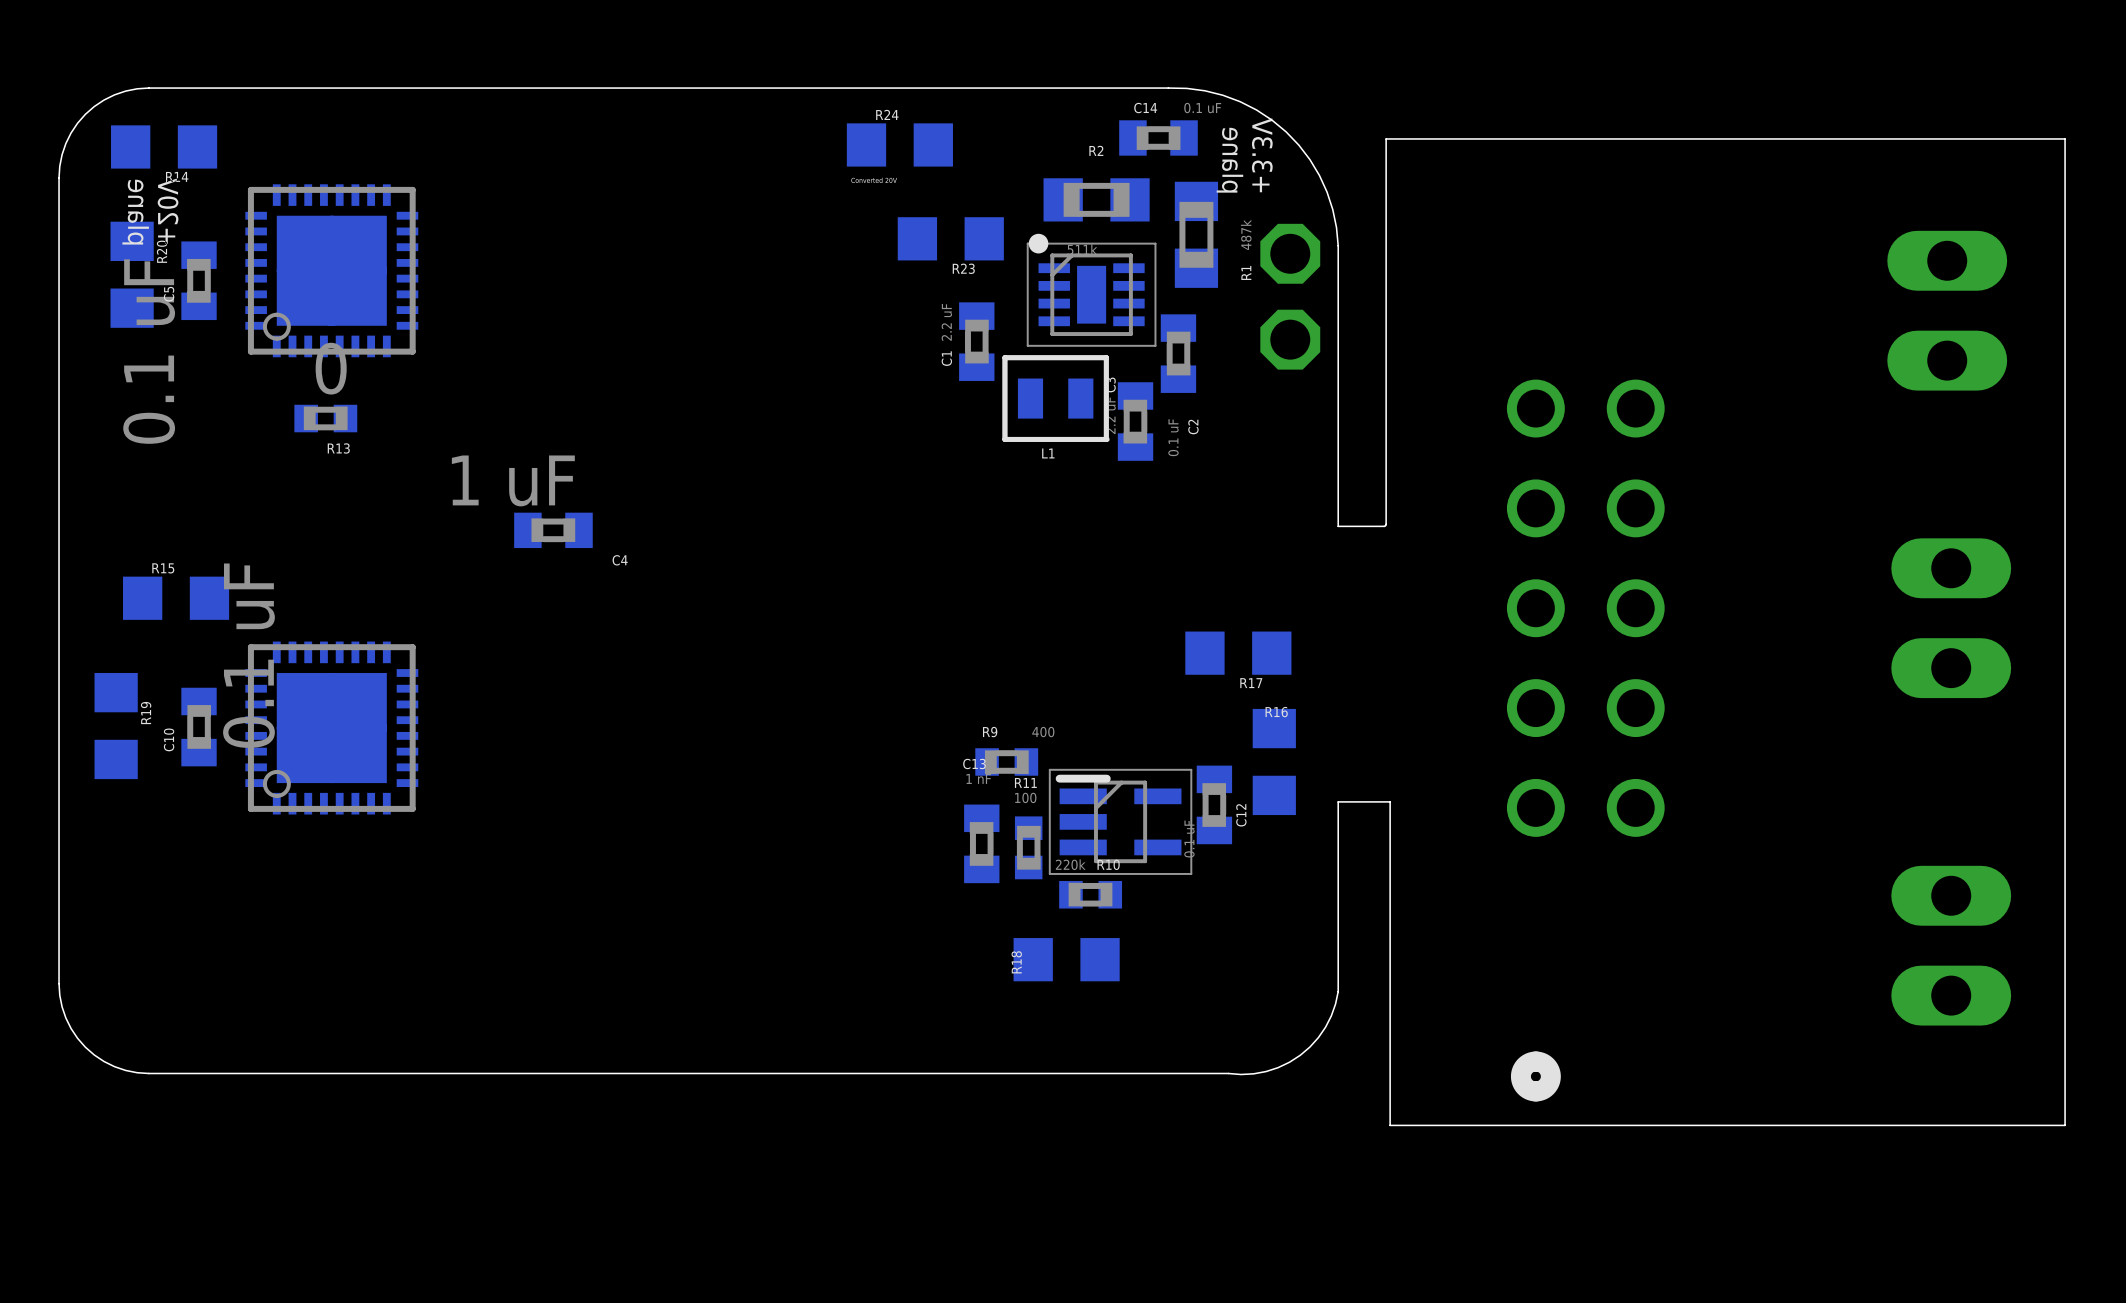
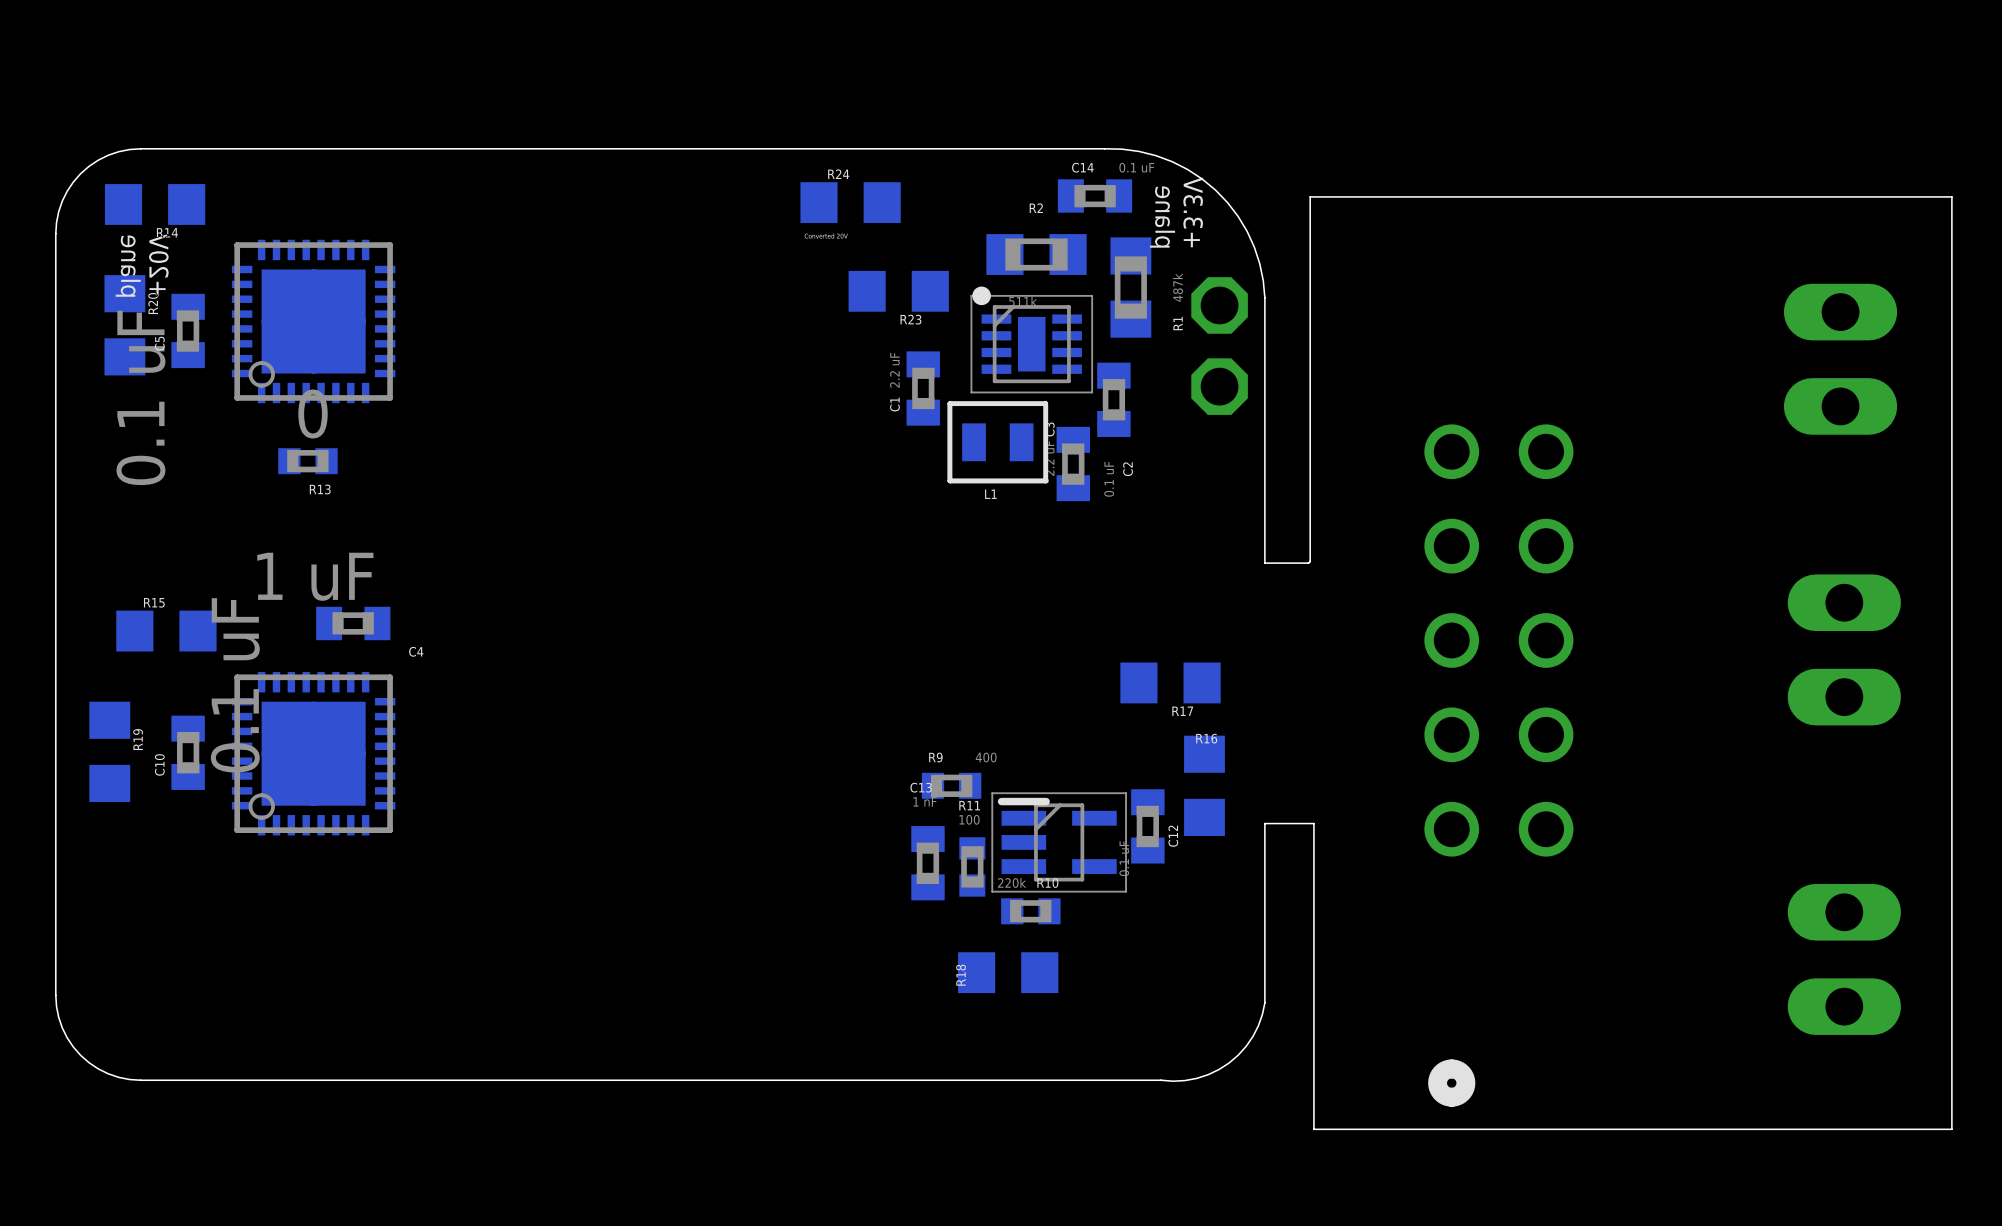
C4 position: (553, 530) -> (353, 623)

